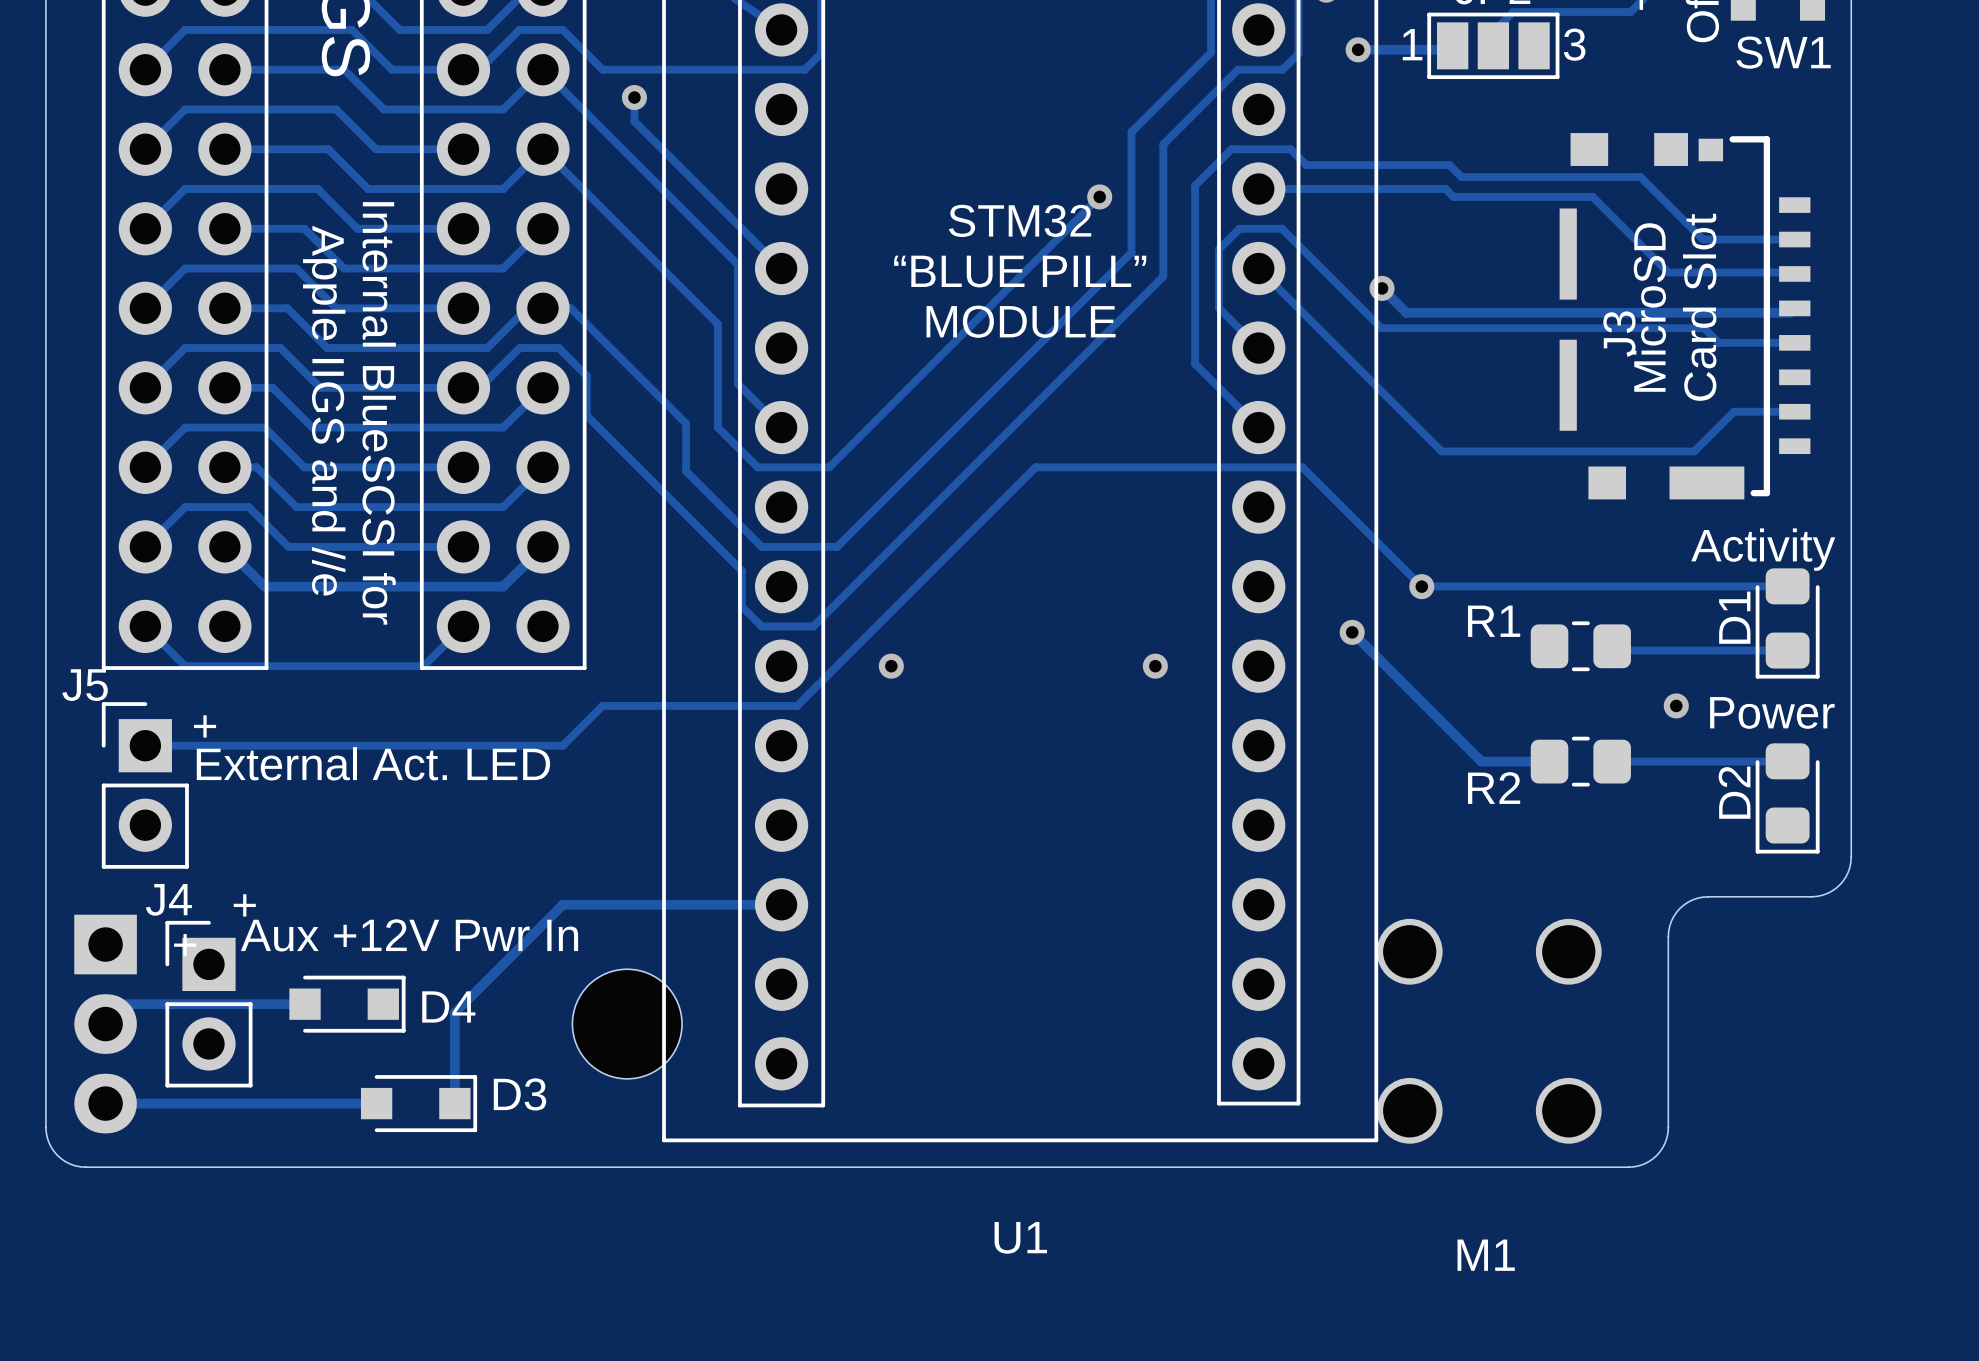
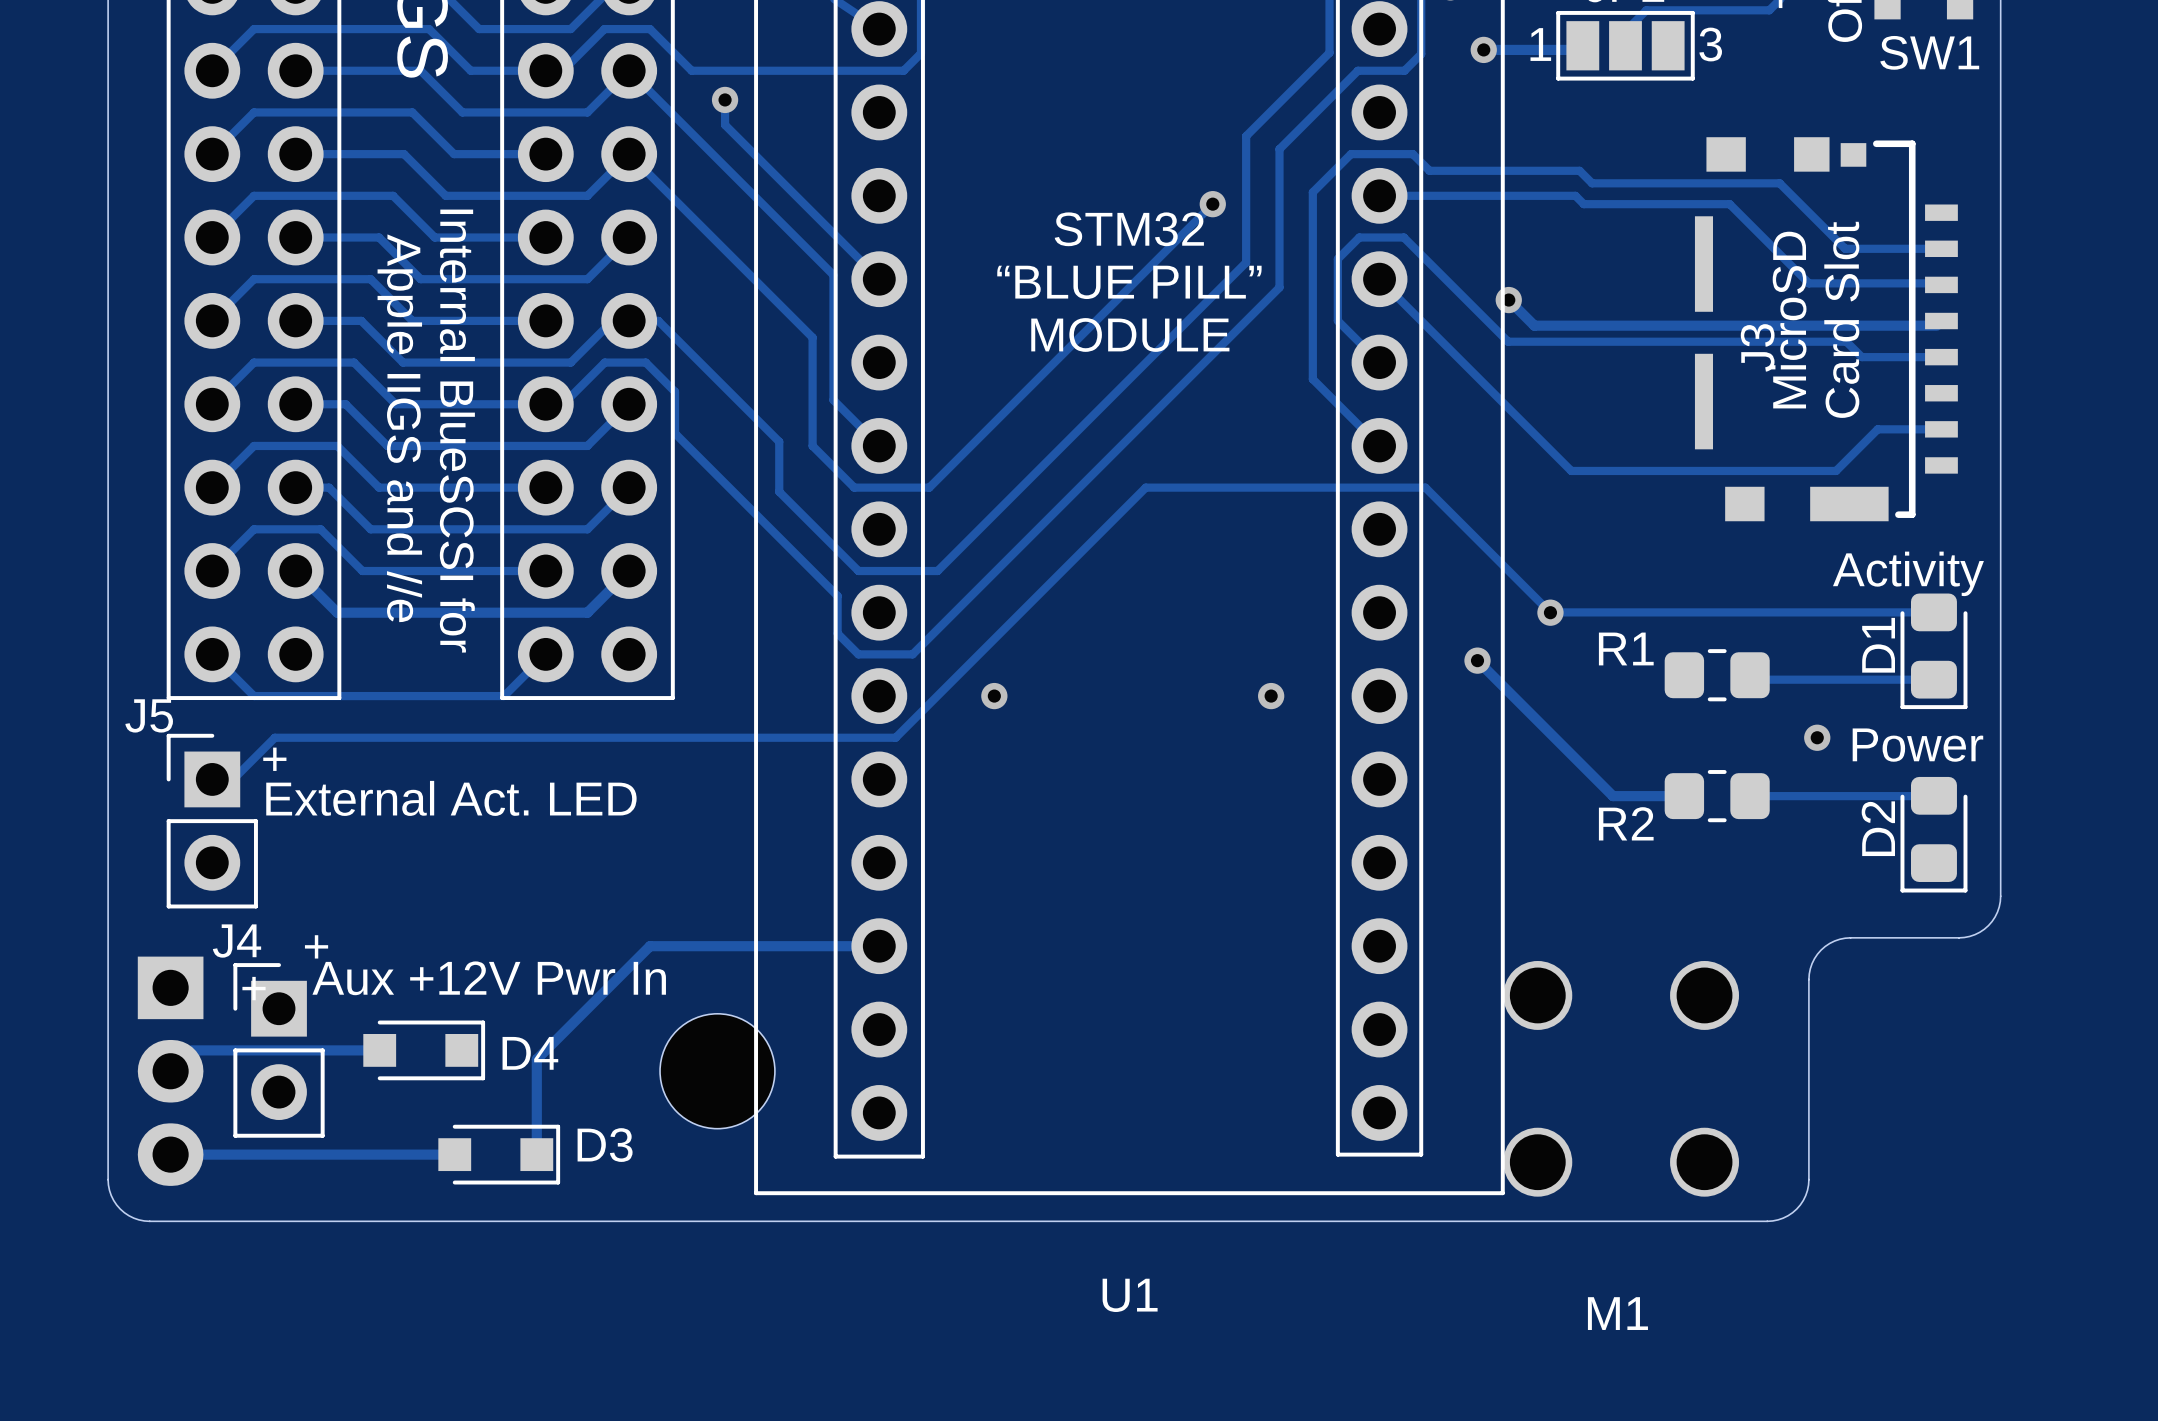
track: (602, 705) (562, 745) (165, 745) -> (691, 737) (274, 737) (212, 800)

